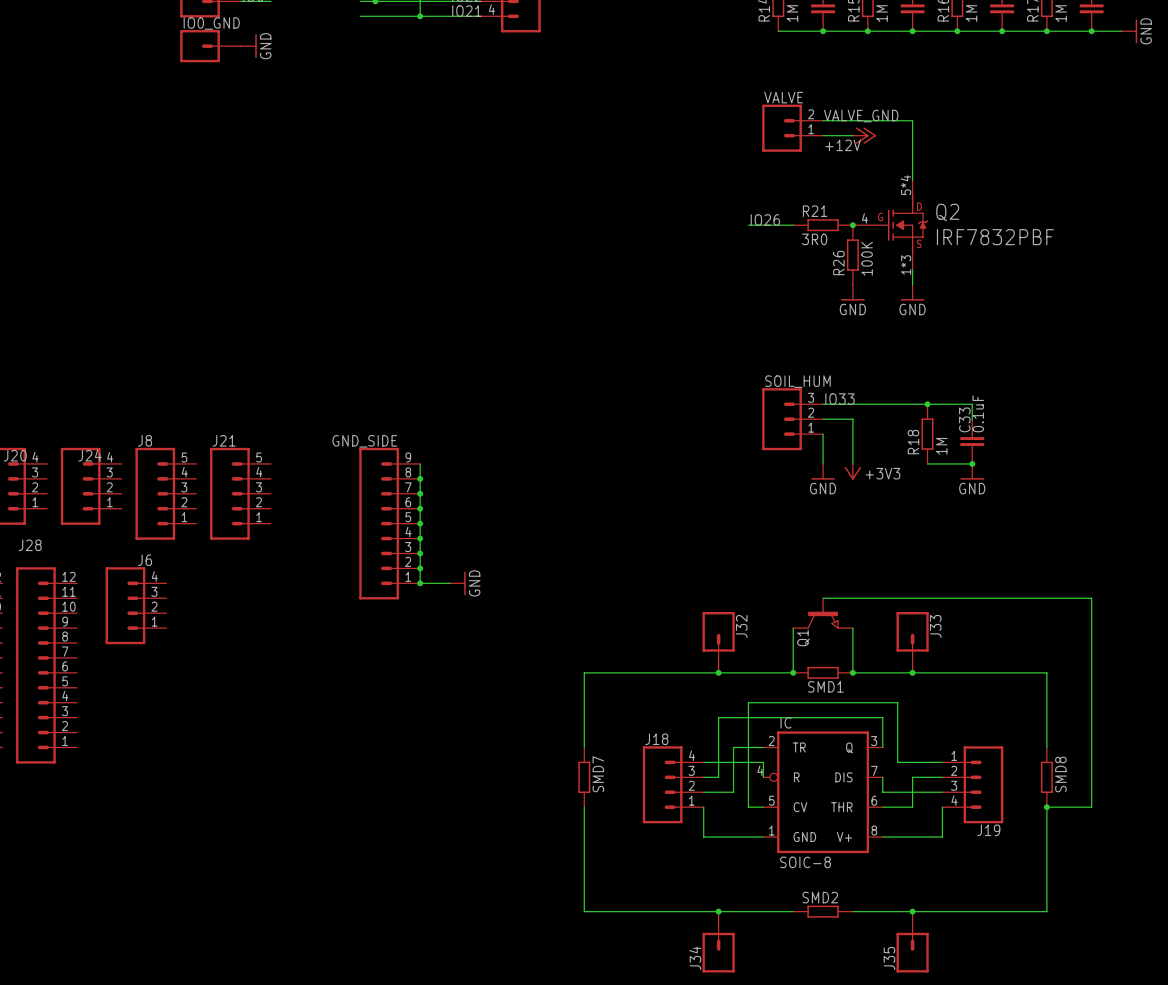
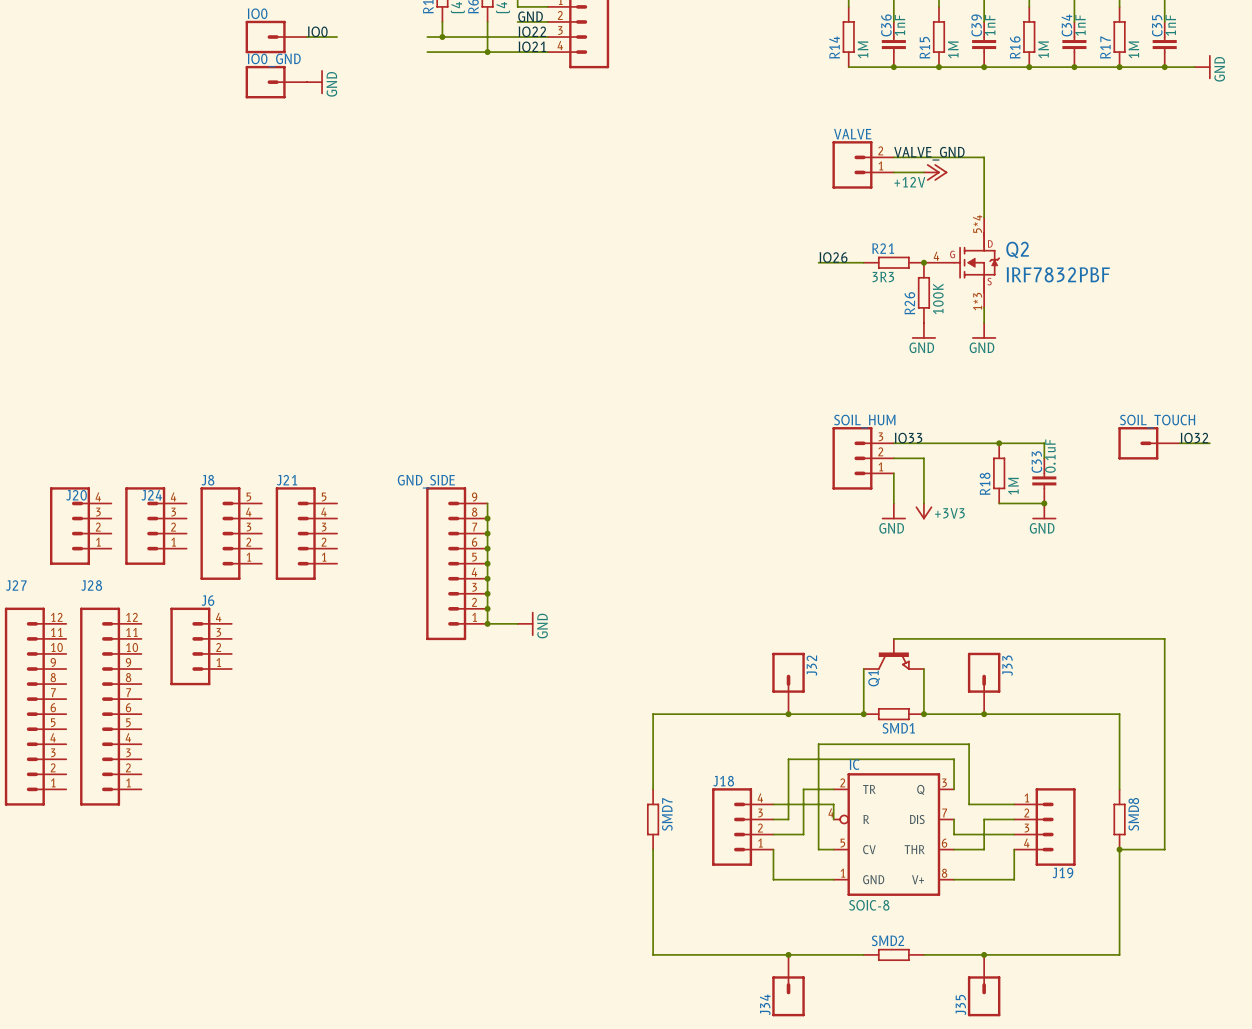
R21 value: 3R0 (814, 239) -> 3R3 (883, 277)
label: none -> IO32 (1194, 438)
SOIL_TOUCH: none -> (1149, 443)
wire: none -> (1179, 443) (1209, 443)

